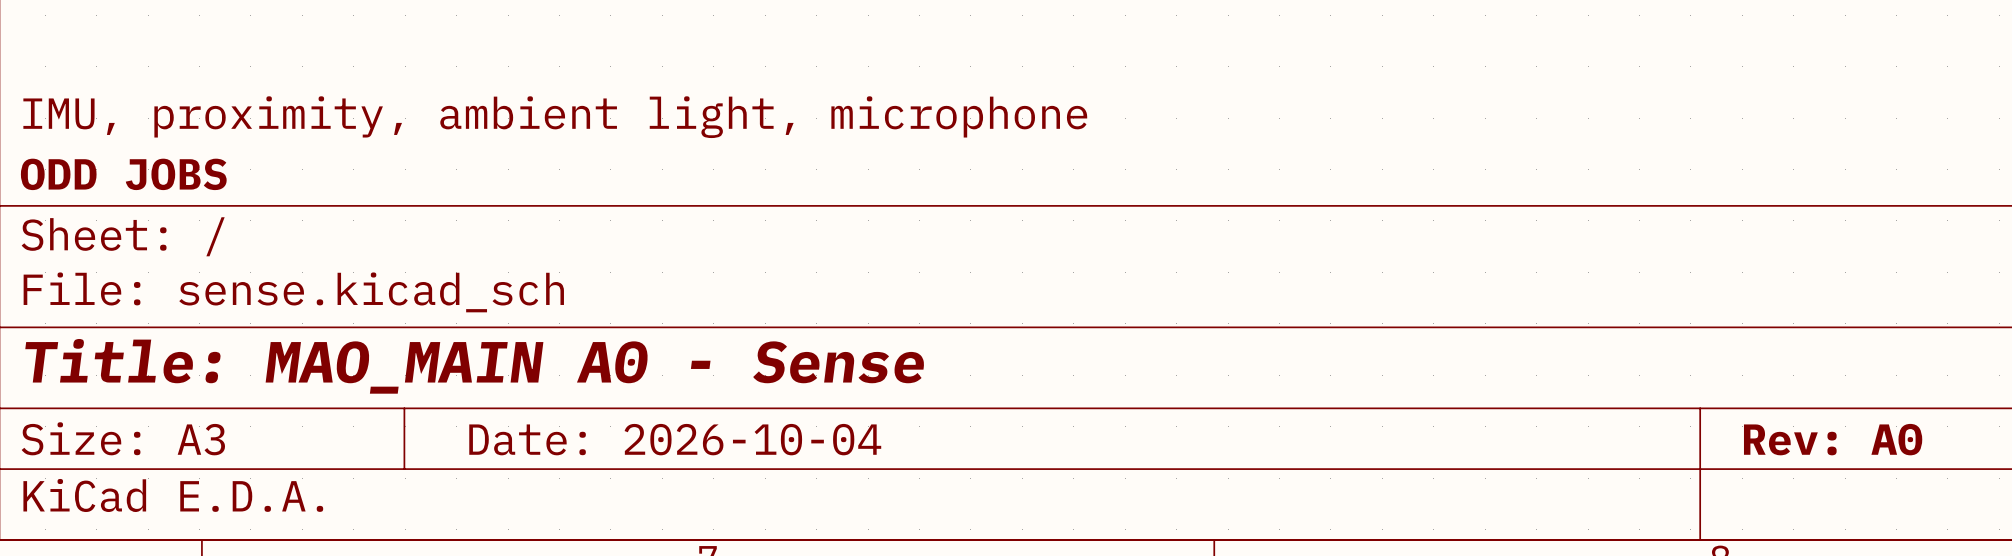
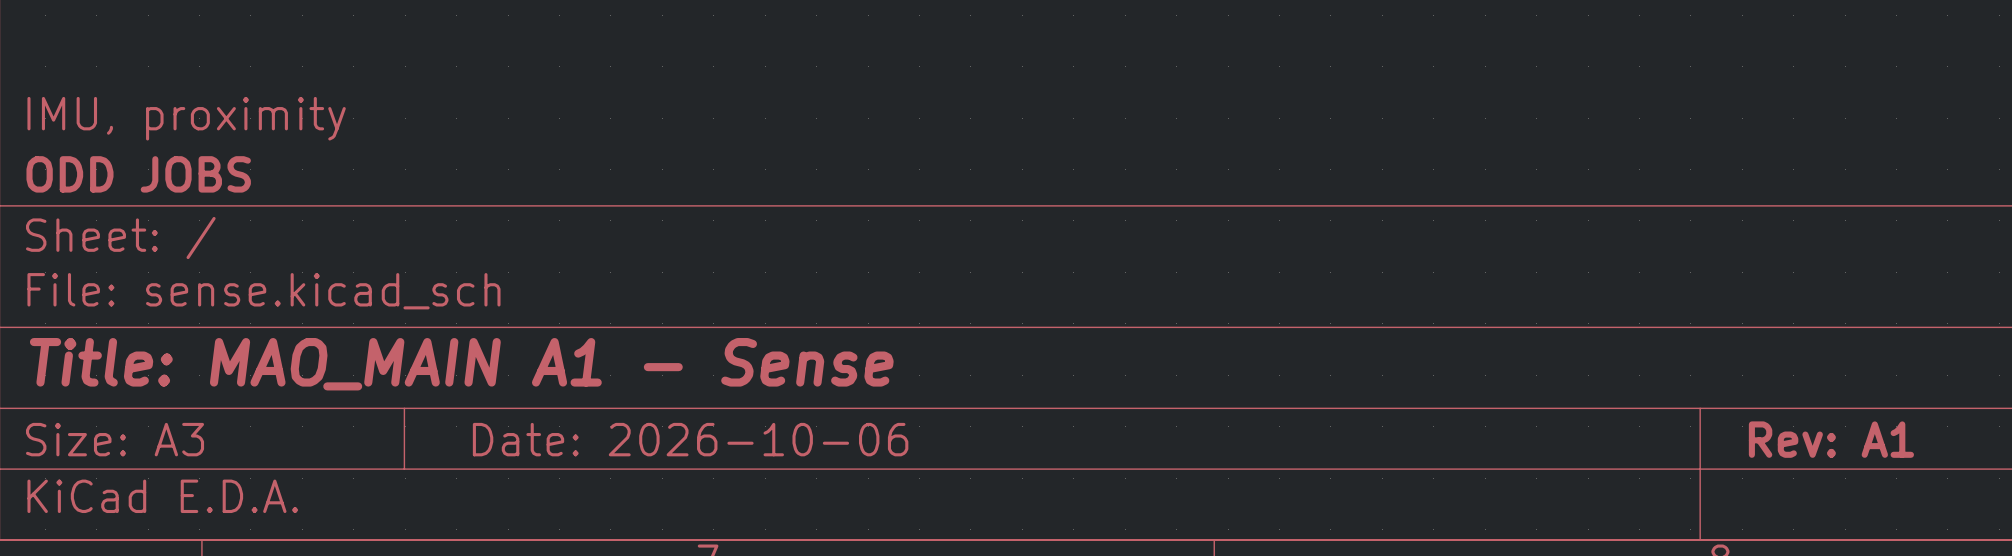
title block: IMU, proximity, ambient light, microphone (555, 117) -> IMU, proximity (186, 118)
title block: Title: MAO_MAIN A0 - Sense (474, 366) -> Title: MAO_MAIN A1 - Sense (461, 364)
title block: Date: 2026-10-04 (675, 439) -> Date: 2026-10-06 (690, 439)
title block: Rev: A0 (1833, 439) -> Rev: A1 (1831, 439)

